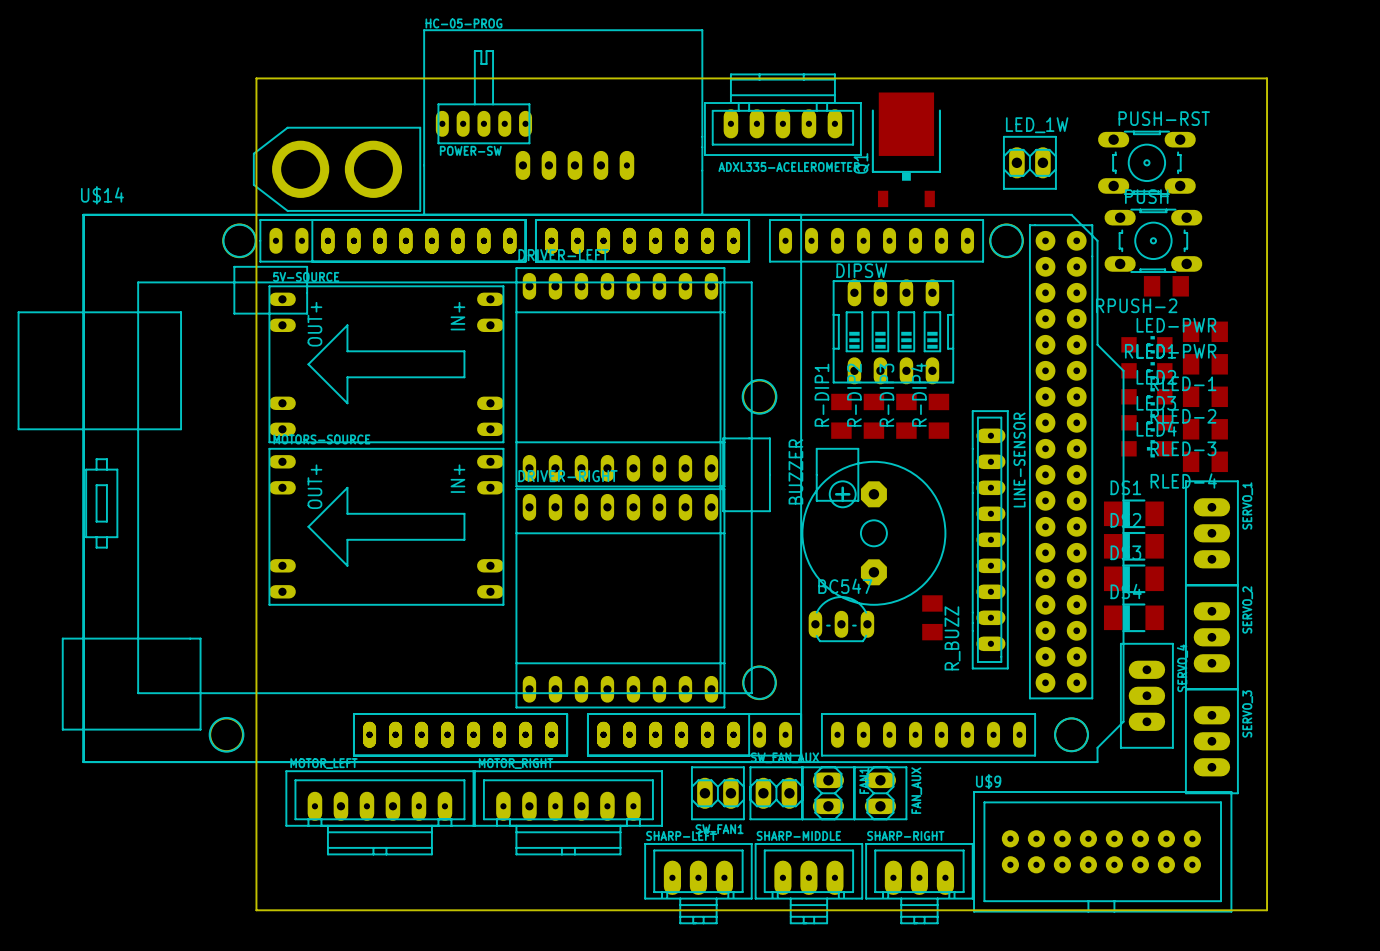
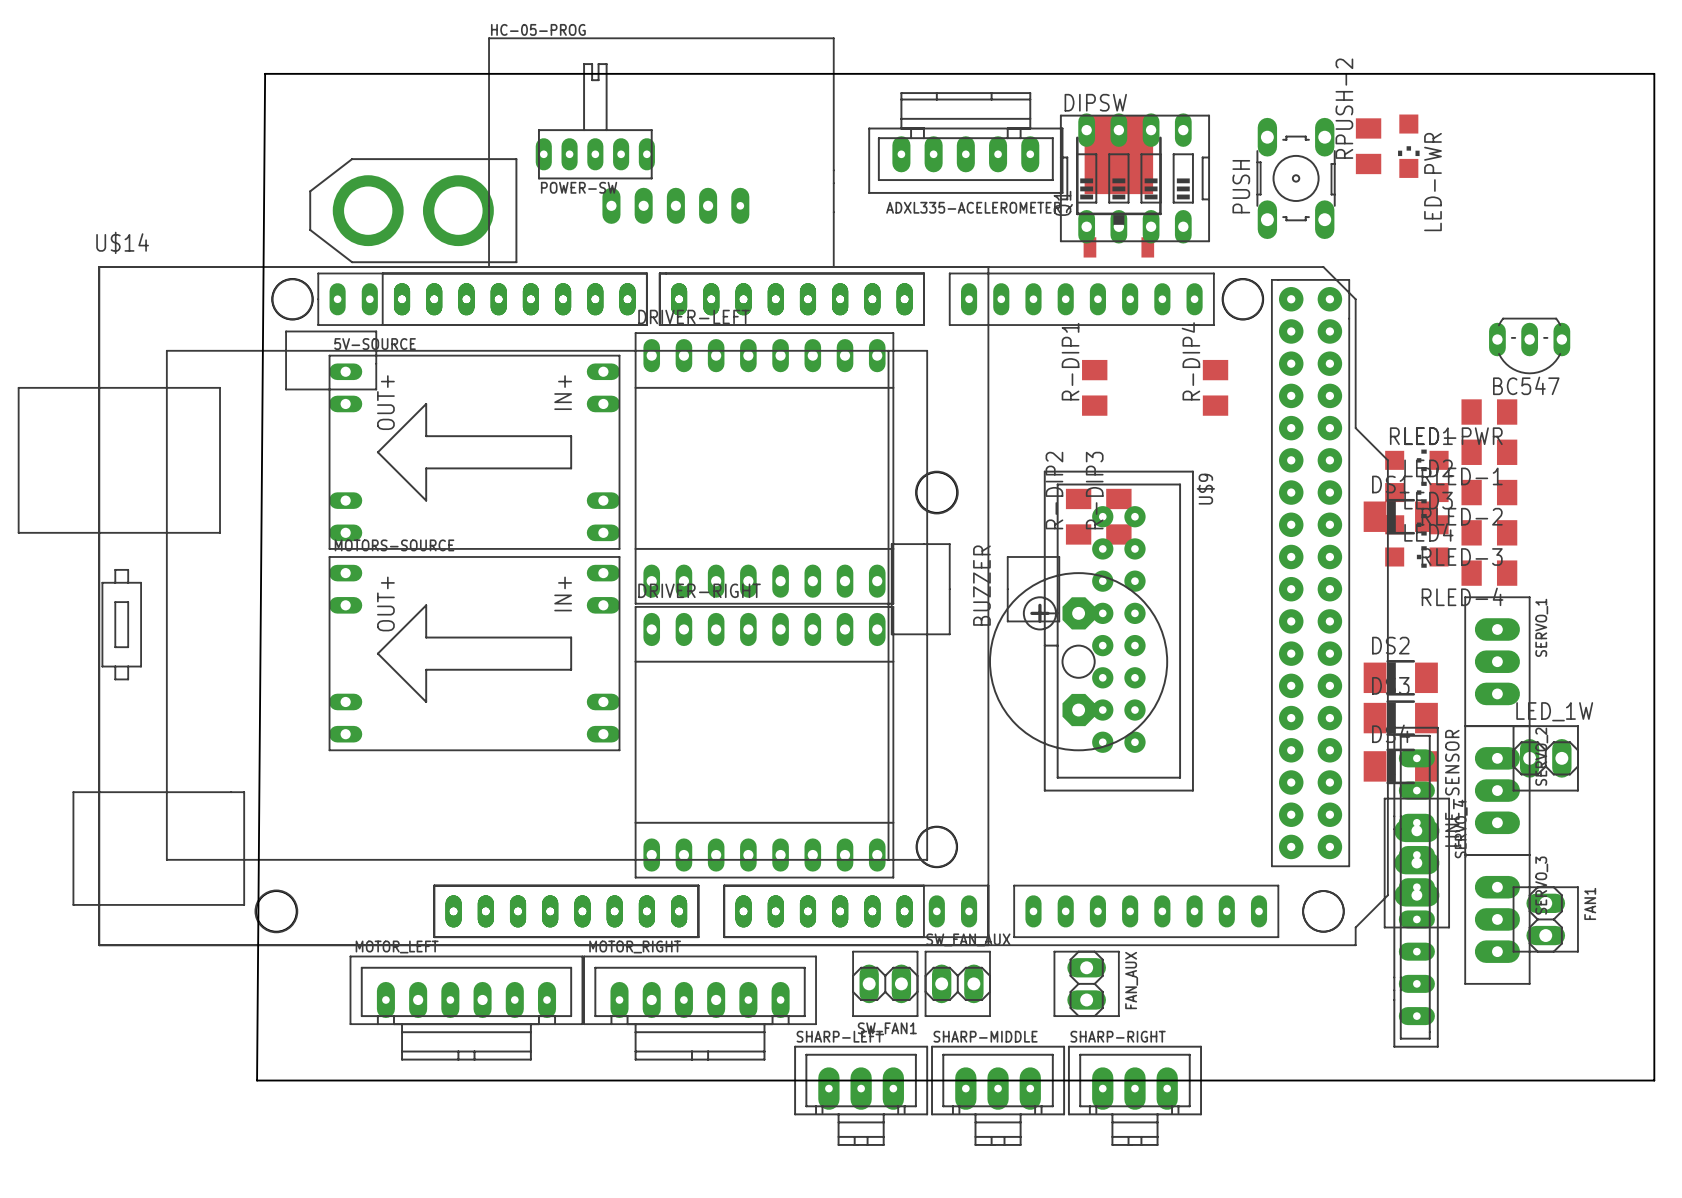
board edge: (256, 78) (1267, 78) (1267, 910) (256, 910) (256, 78) -> (265, 73) (257, 1080) (1654, 1080) (1654, 73) (265, 73)
HC-05-PROG position: (563, 122) -> (661, 152)
LED_1W position: (1029, 162) -> (1545, 758)
PUSH-RST: (1146, 162) -> none
PUSH rotation: 0° (1153, 240) -> 90° counterclockwise (1296, 178)
PUSH position: (1153, 240) -> (1296, 178)
RPUSH-2 rotation: 0° (1166, 286) -> 90° clockwise (1368, 146)
RPUSH-2 position: (1166, 286) -> (1368, 146)
DIPSW position: (893, 331) -> (1134, 178)
LED-PWR rotation: 0° (1146, 344) -> 90° clockwise (1408, 146)
LED-PWR position: (1146, 344) -> (1408, 146)
R-DIP1 position: (841, 416) -> (1094, 387)
R-DIP4 position: (938, 416) -> (1215, 387)
DS1 position: (1133, 513) -> (1400, 516)
LINE-SENSOR position: (990, 539) -> (1416, 887)
R_BUZZ: (932, 617) -> none
BC547 rotation: 0° (841, 619) -> 180° (1529, 345)
BC547 position: (841, 619) -> (1529, 345)
FAN1 position: (828, 793) -> (1545, 919)
U$9 rotation: 0° (1102, 851) -> 90° clockwise (1118, 631)
U$9 position: (1102, 851) -> (1118, 631)

